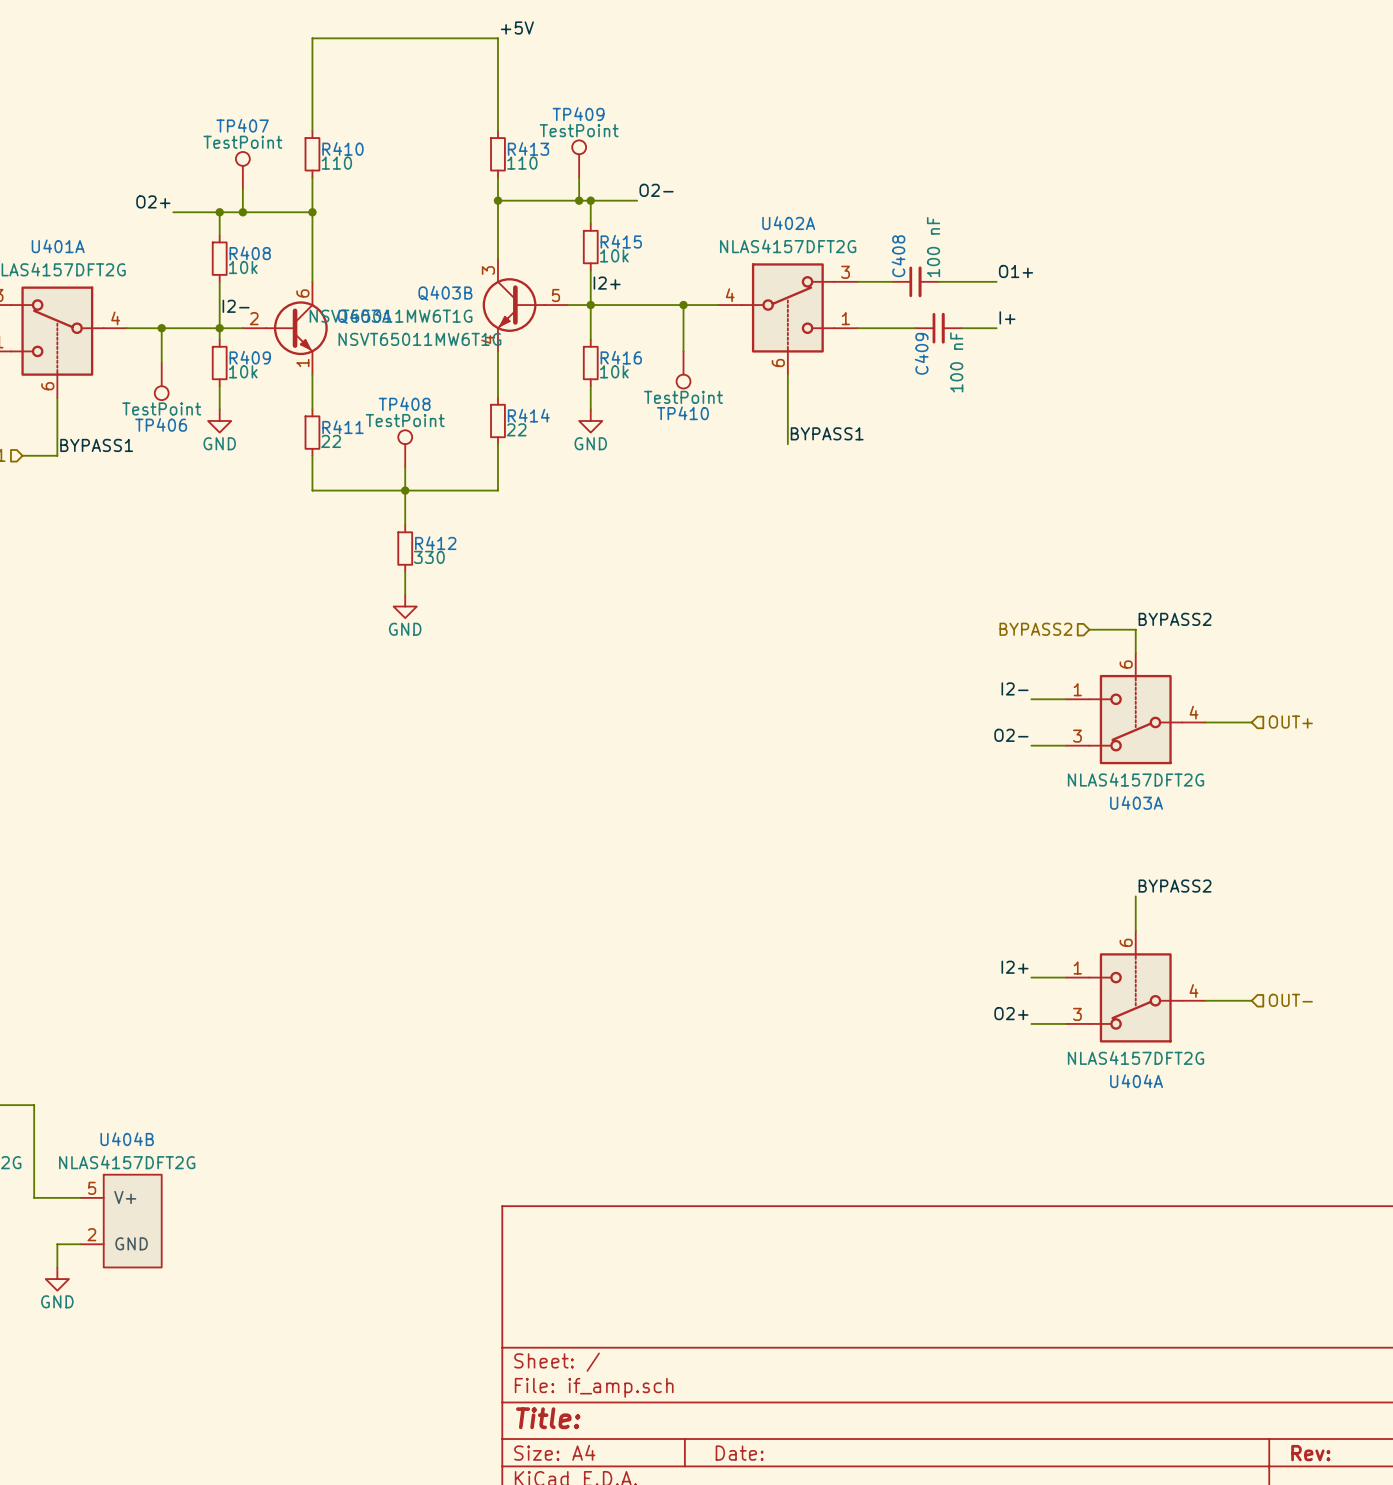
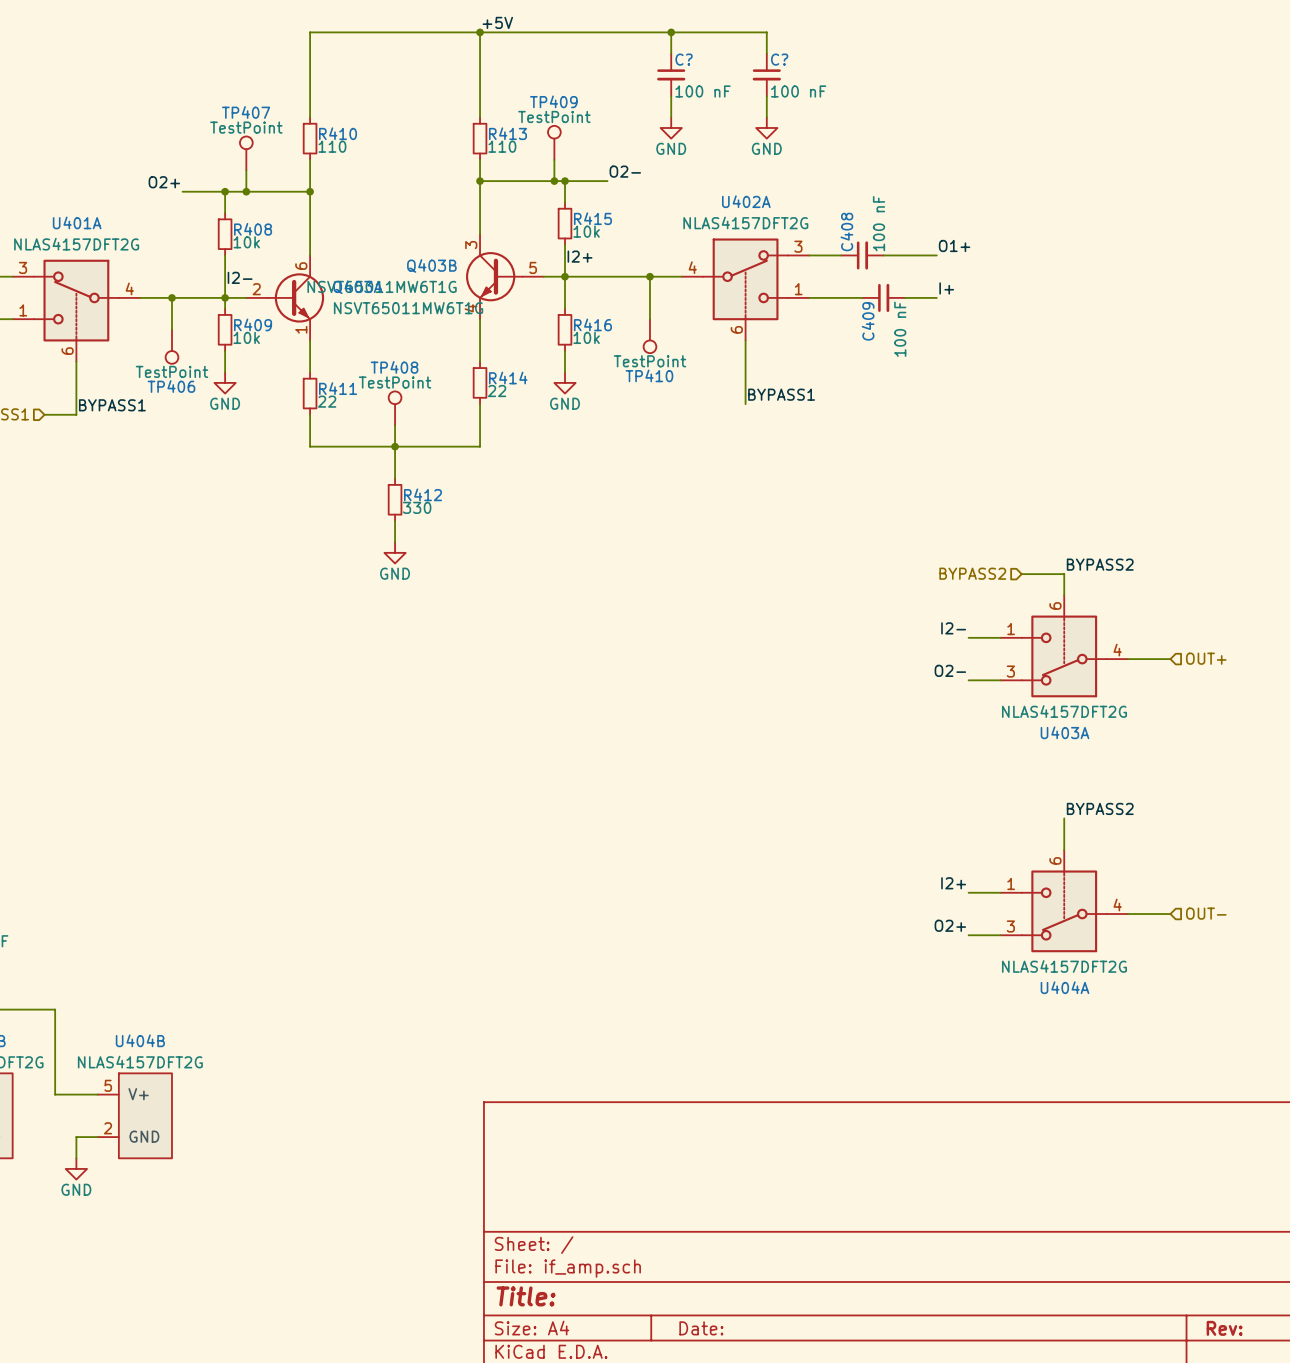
wire: none -> (480, 32) (766, 32) (766, 53)
junction: none -> (480, 32)
wire: none -> (671, 32) (671, 53)
junction: none -> (671, 32)
C?: none -> 100 nF (671, 74)
C?: none -> 100 nF (766, 74)
wire: none -> (671, 96) (671, 117)
wire: none -> (766, 96) (766, 117)
power symbol: none -> GND (671, 127)
power symbol: none -> GND (766, 127)

